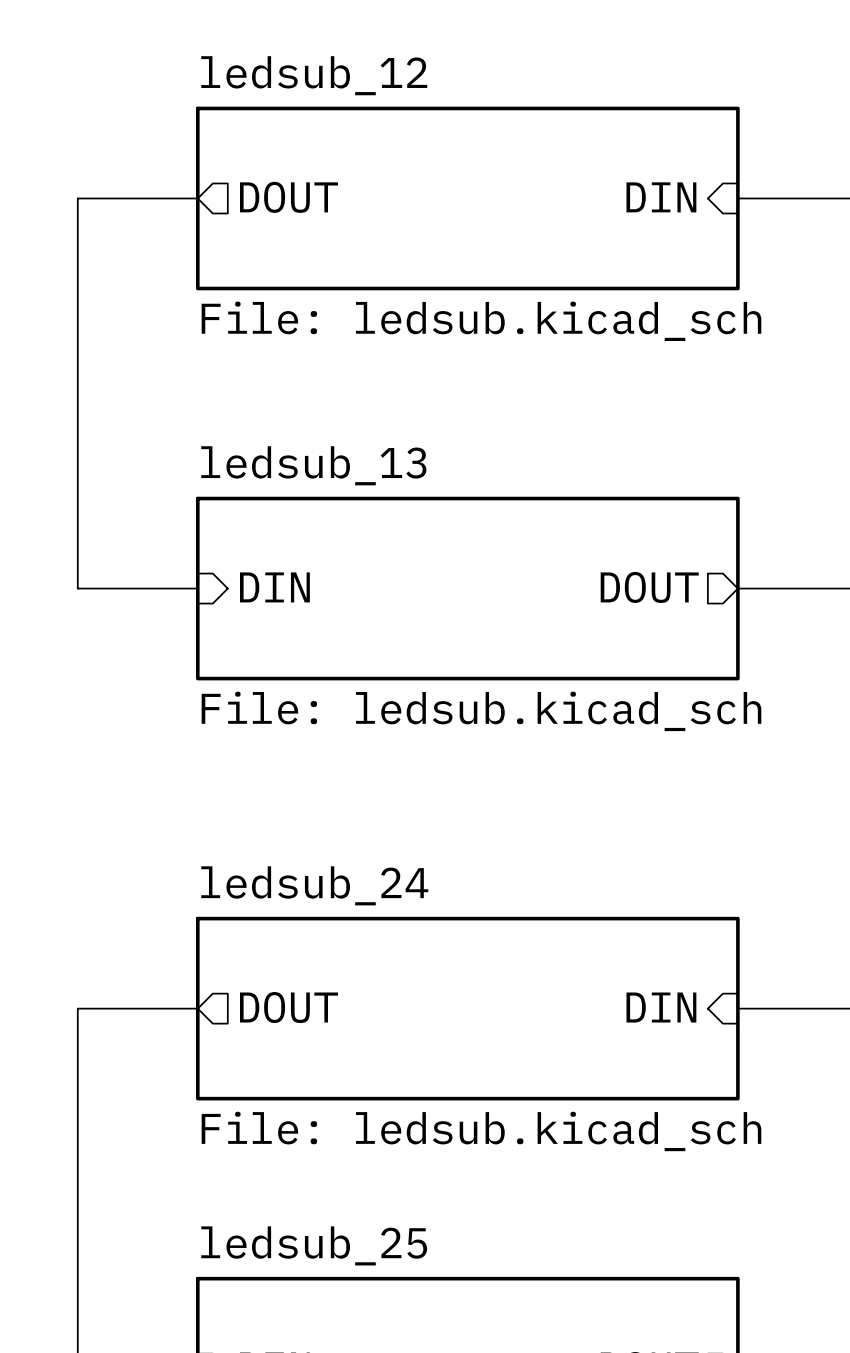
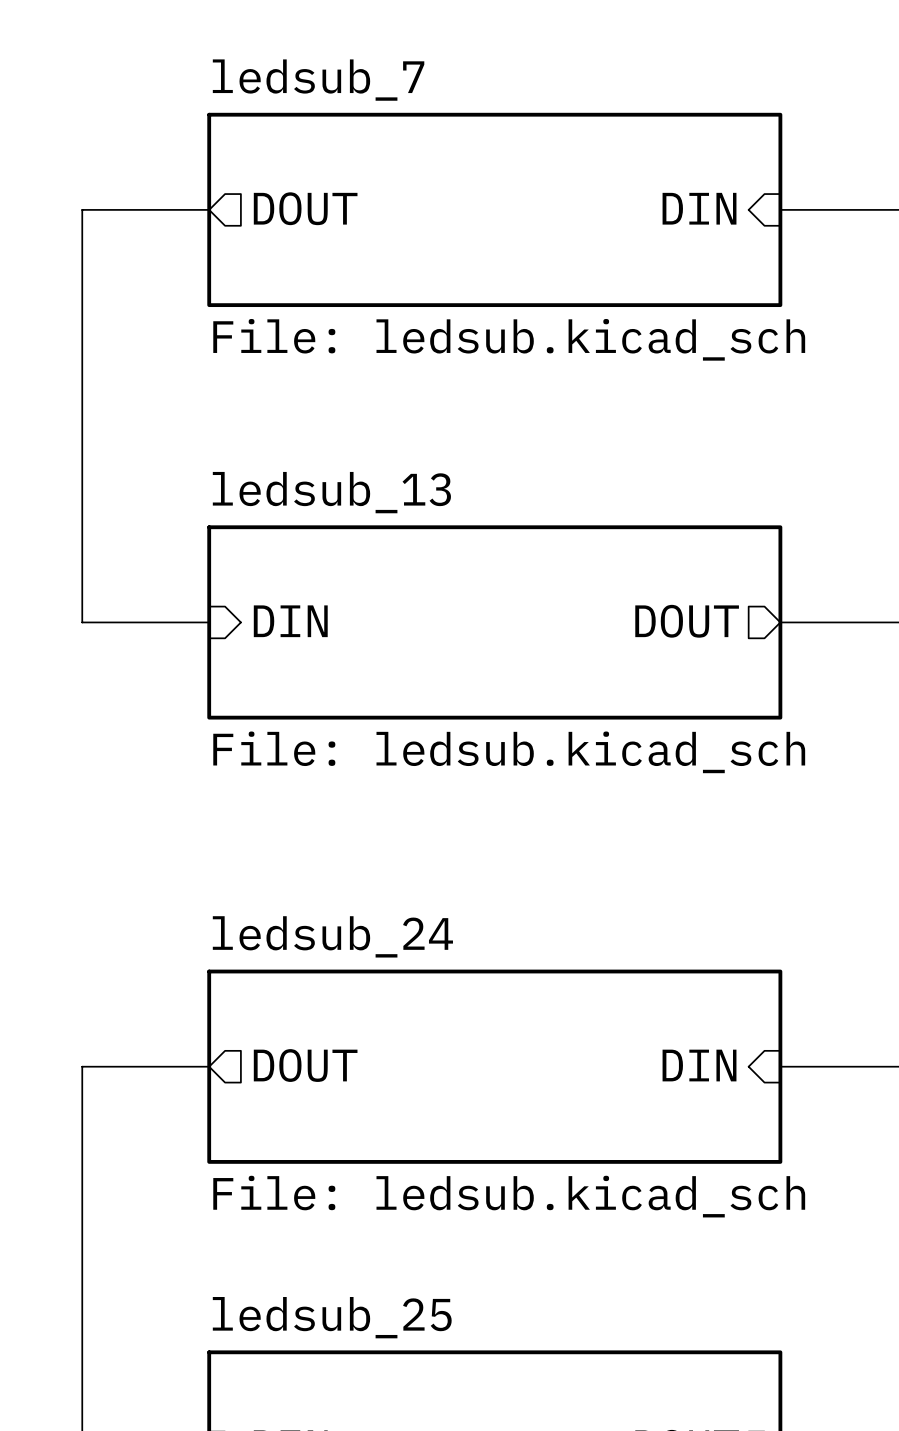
sheet ledsub_12 name: ledsub_12 (314, 75) -> ledsub_7 (318, 80)

